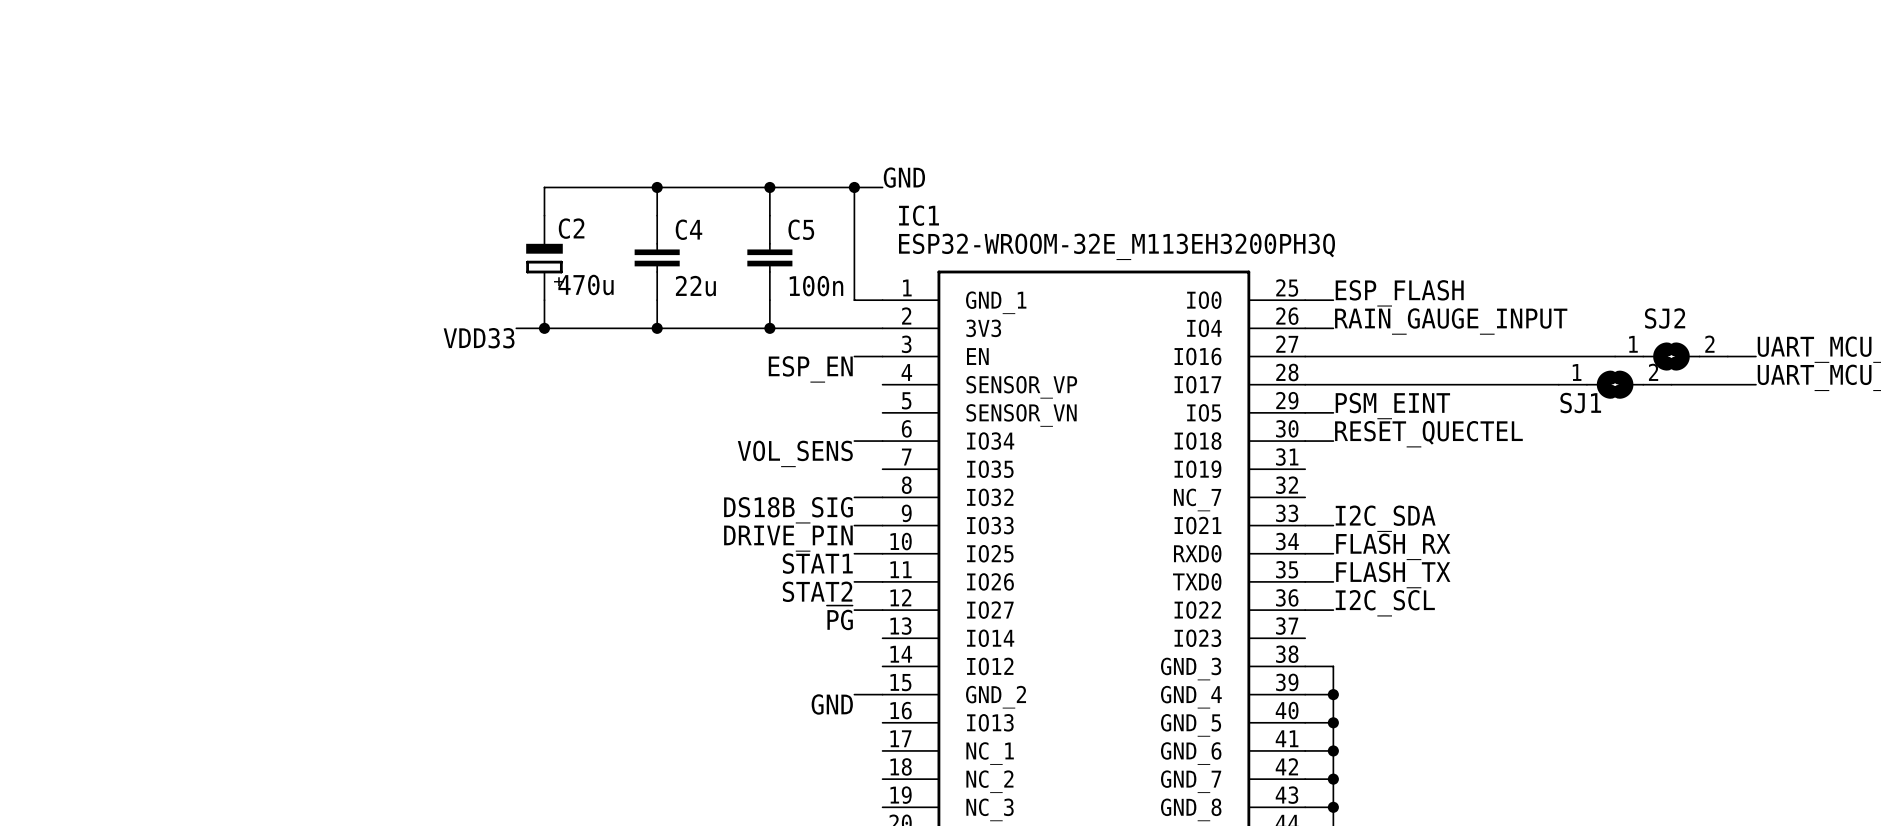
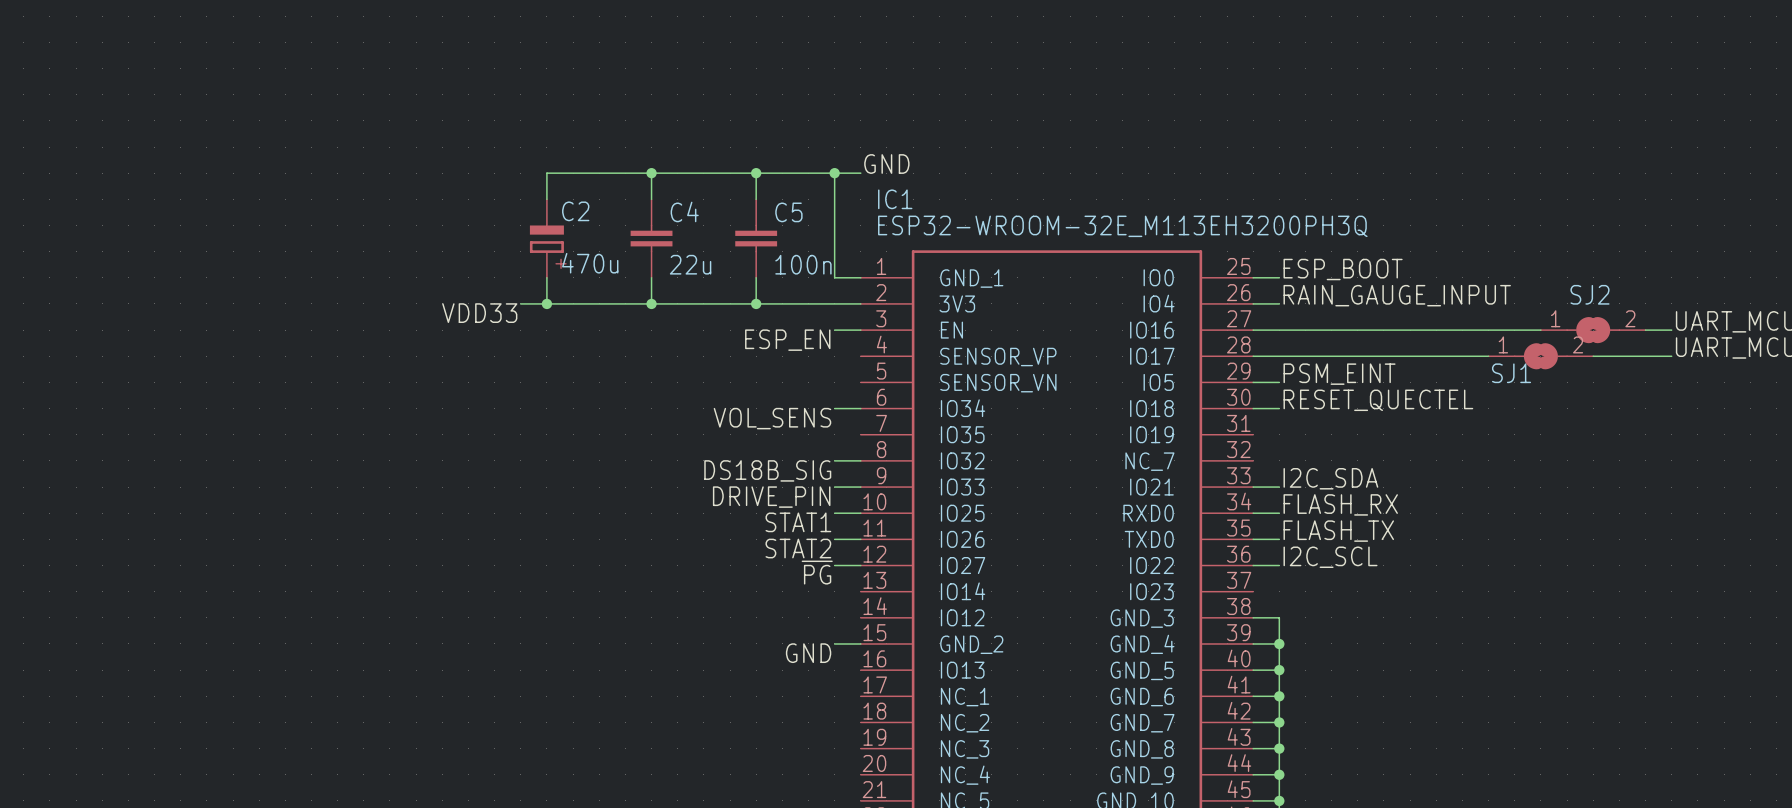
label: ESP_FLASH (1399, 293) -> ESP_BOOT (1343, 269)

